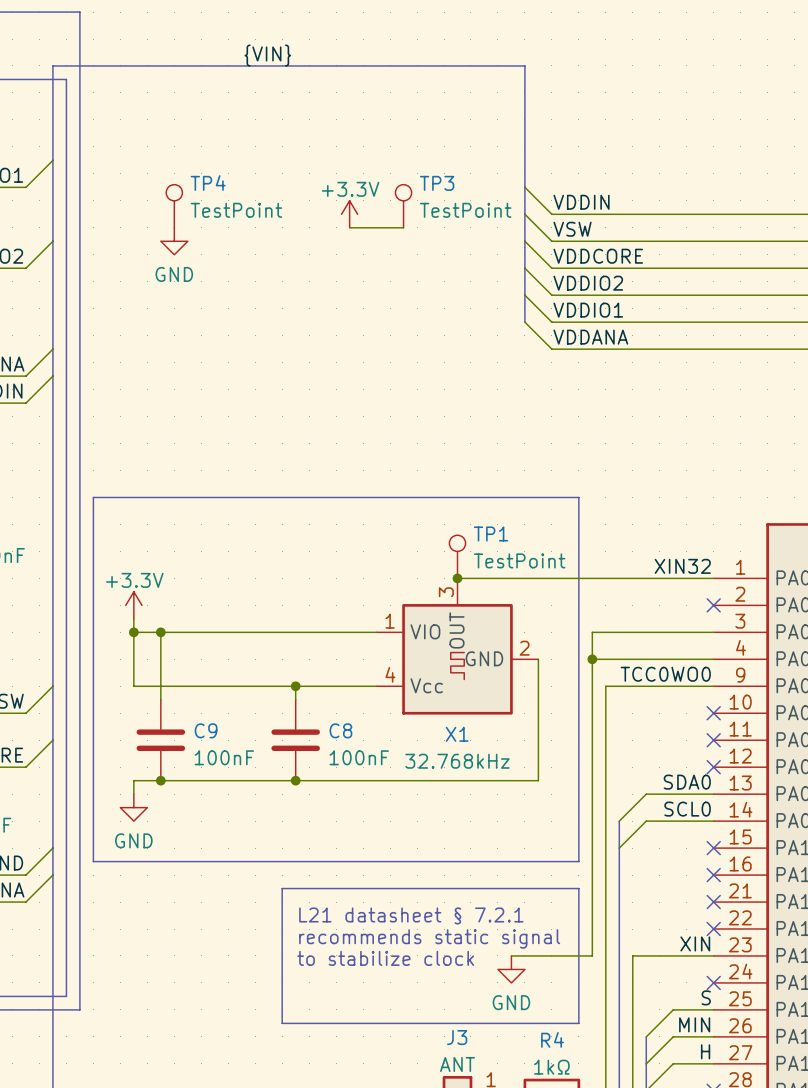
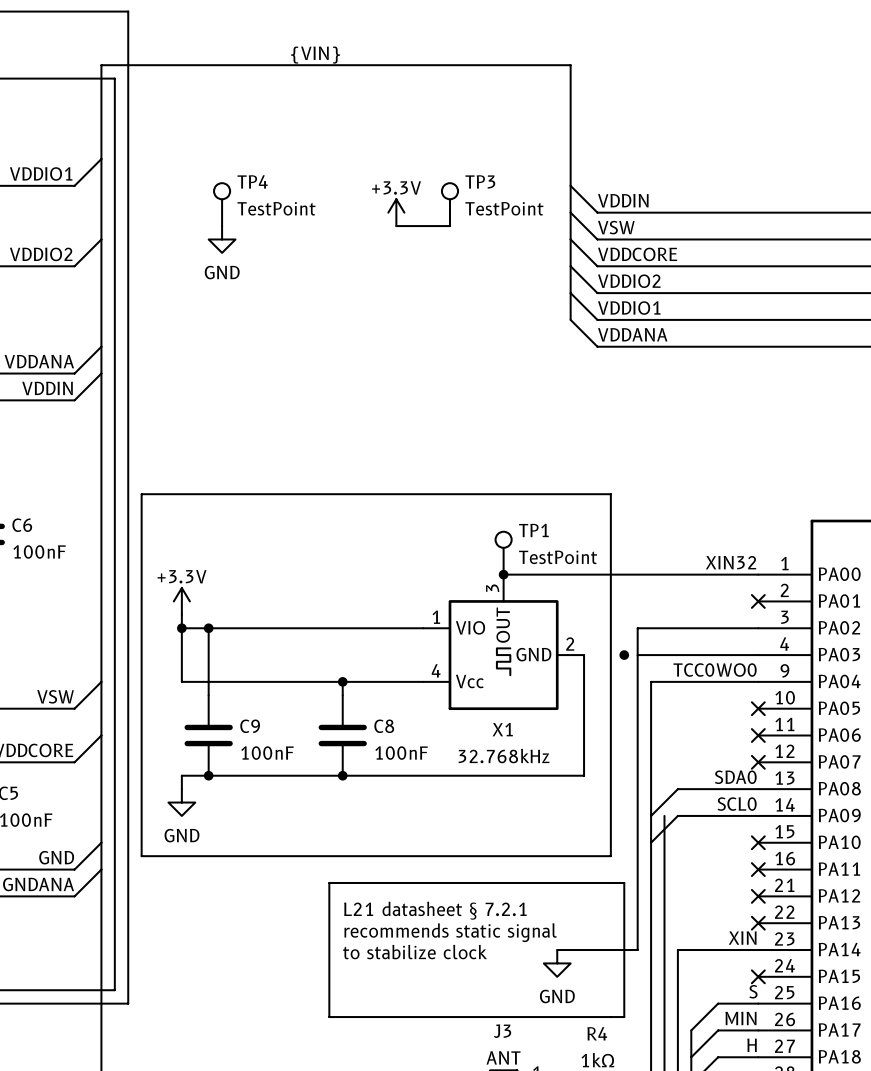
line: (565, 497) (578, 497) (578, 861) (565, 861) -> (610, 494) (610, 856)
junction position: (592, 659) -> (624, 655)
wire: (646, 794) (619, 821) -> (691, 789) (677, 789) (651, 815)
wire: (646, 821) (619, 848) -> (691, 815) (677, 815) (651, 842)

